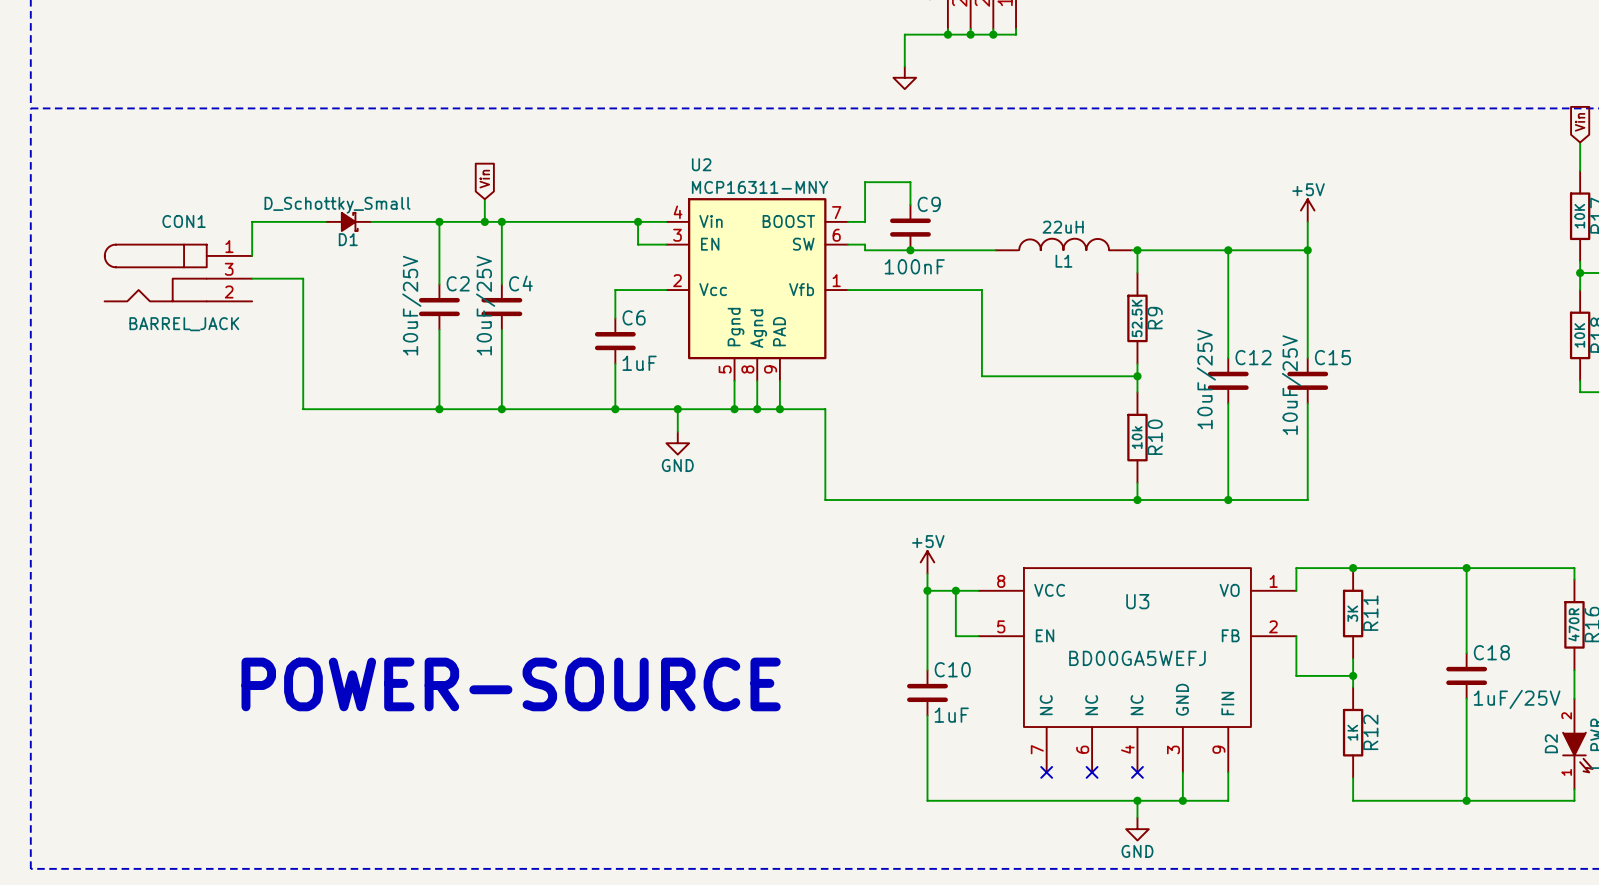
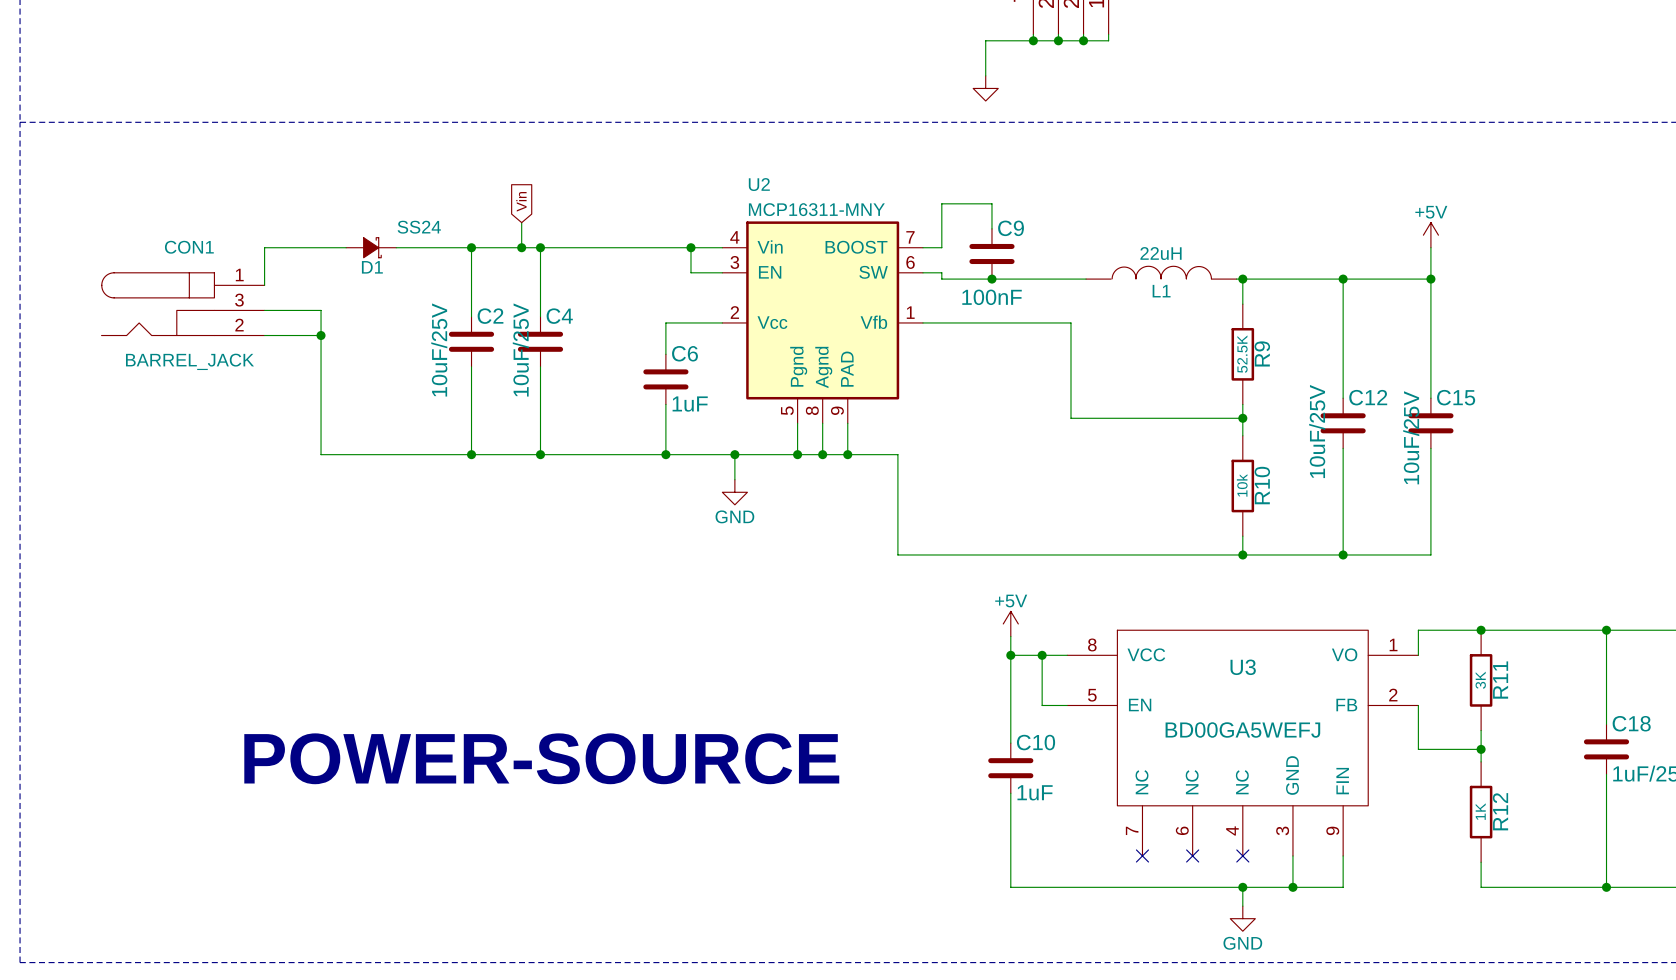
D1 value: D_Schottky_Small (337, 205) -> SS24 (419, 227)
wire: none -> (264, 335) (321, 335)
junction: none -> (321, 335)

